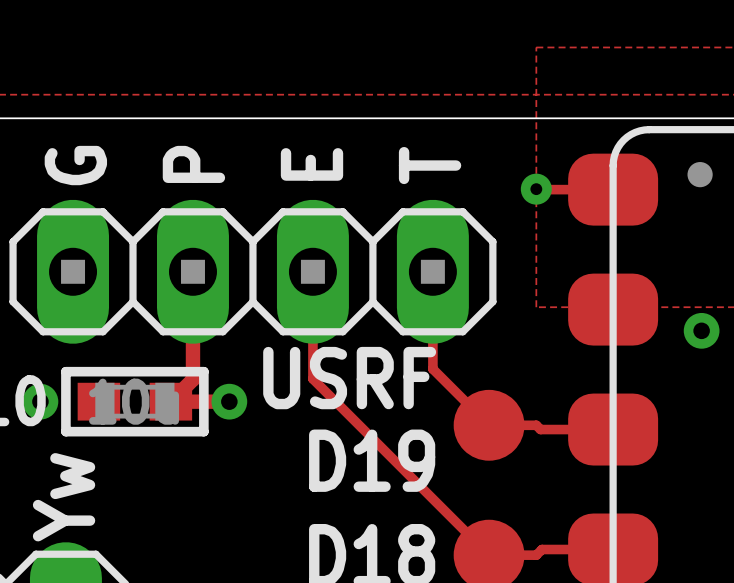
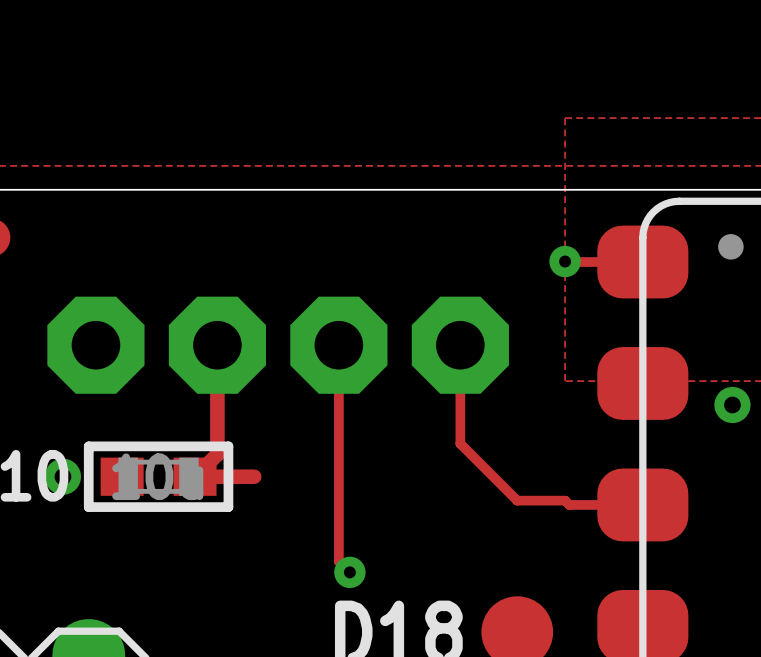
text: P (193, 164) -> none
text: E (312, 164) -> none
text: G (75, 165) -> none
text: T (430, 165) -> none
USRF: (252, 271) -> none
part: none -> (278, 345)
track: (312, 379) (489, 555) (536, 555) (542, 549) (613, 549) -> (338, 453) (338, 561) (349, 572)
via: (229, 401) -> none
D19: (489, 425) -> none
via: none -> (349, 572)
text: Yw (64, 497) -> none

